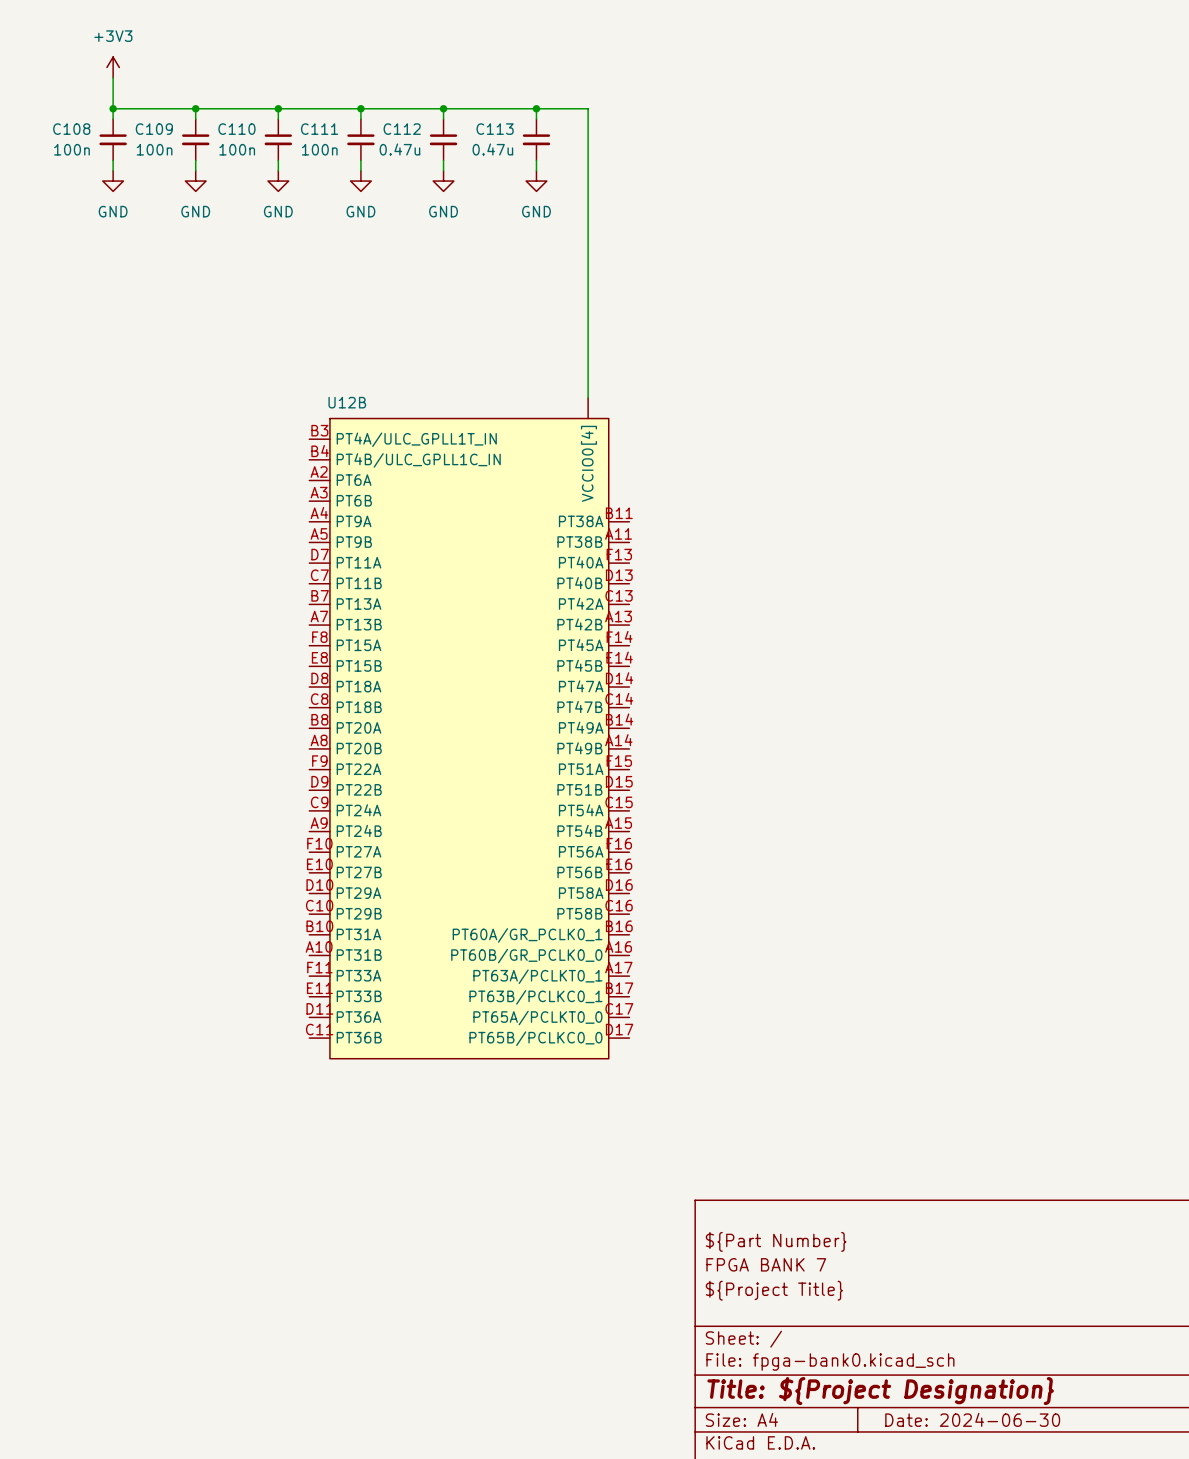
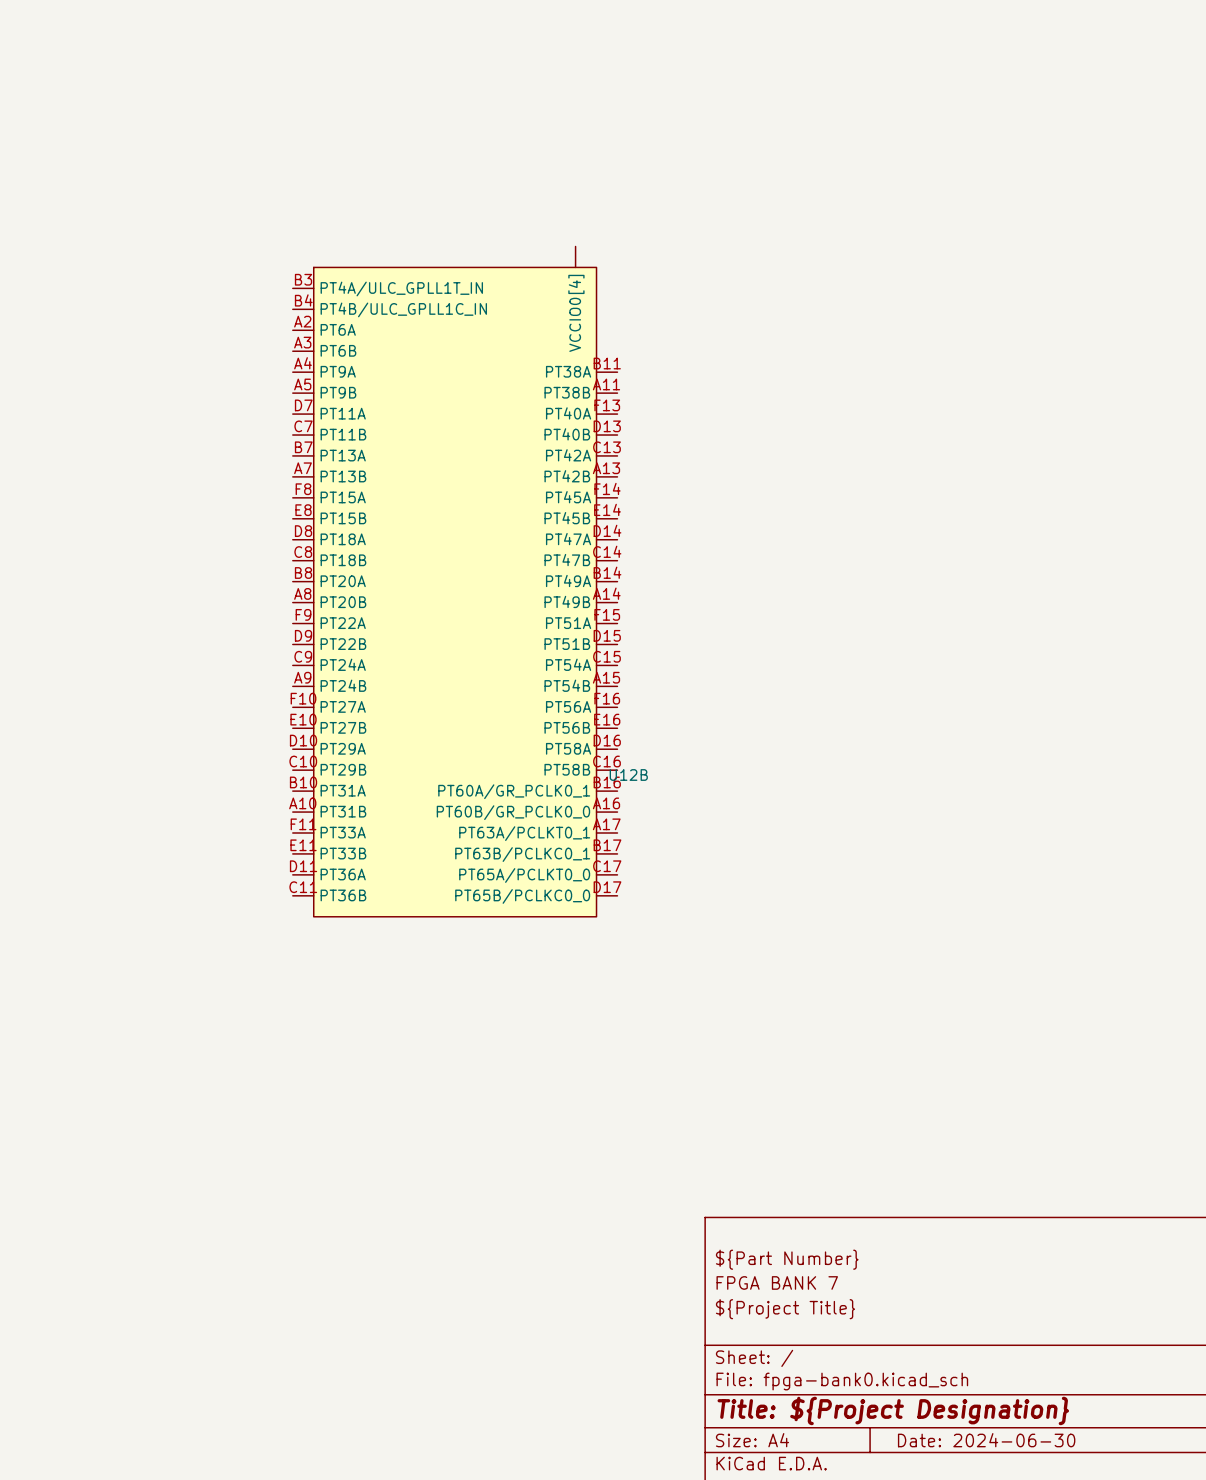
power symbol: +3V3 (113, 67) -> none
wire: (113, 77) (113, 119) -> none
wire: (113, 108) (588, 108) (588, 397) -> none
junction: (113, 108) -> none
wire: (195, 108) (195, 119) -> none
junction: (195, 108) -> none
wire: (278, 108) (278, 119) -> none
junction: (278, 108) -> none
wire: (360, 108) (360, 119) -> none
junction: (360, 108) -> none
wire: (443, 108) (443, 119) -> none
junction: (443, 108) -> none
wire: (536, 108) (536, 119) -> none
junction: (536, 108) -> none
C108: 100n (113, 139) -> none
C109: 100n (195, 139) -> none
C110: 100n (278, 139) -> none
C111: 100n (360, 139) -> none
C112: 0.47u (443, 139) -> none
C113: 0.47u (536, 139) -> none
wire: (113, 160) (113, 170) -> none
wire: (195, 160) (195, 170) -> none
wire: (278, 160) (278, 170) -> none
wire: (360, 160) (360, 170) -> none
wire: (443, 160) (443, 170) -> none
wire: (536, 160) (536, 170) -> none
power symbol: GND (113, 181) -> none
power symbol: GND (195, 181) -> none
power symbol: GND (278, 181) -> none
power symbol: GND (360, 181) -> none
power symbol: GND (443, 181) -> none
power symbol: GND (536, 181) -> none
U12B name position: U12B (347, 402) -> U12B (628, 775)
U12B position: (469, 728) -> (455, 581)

